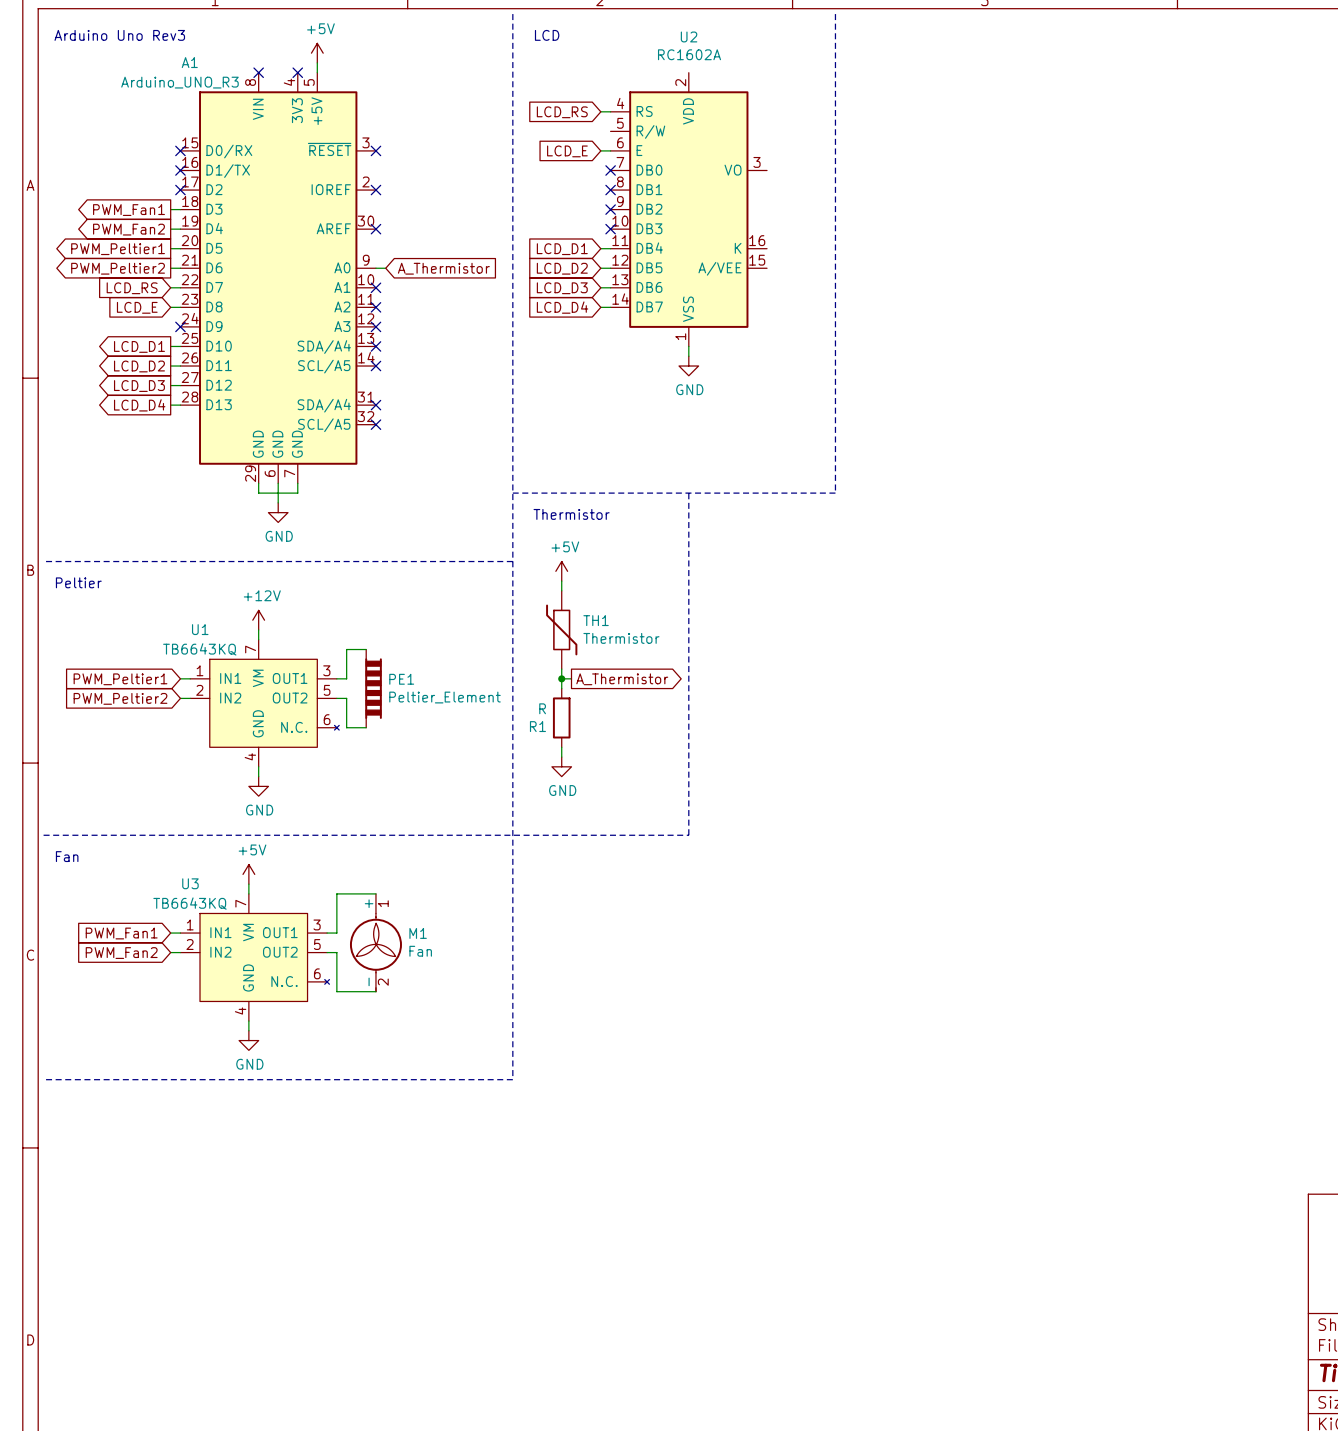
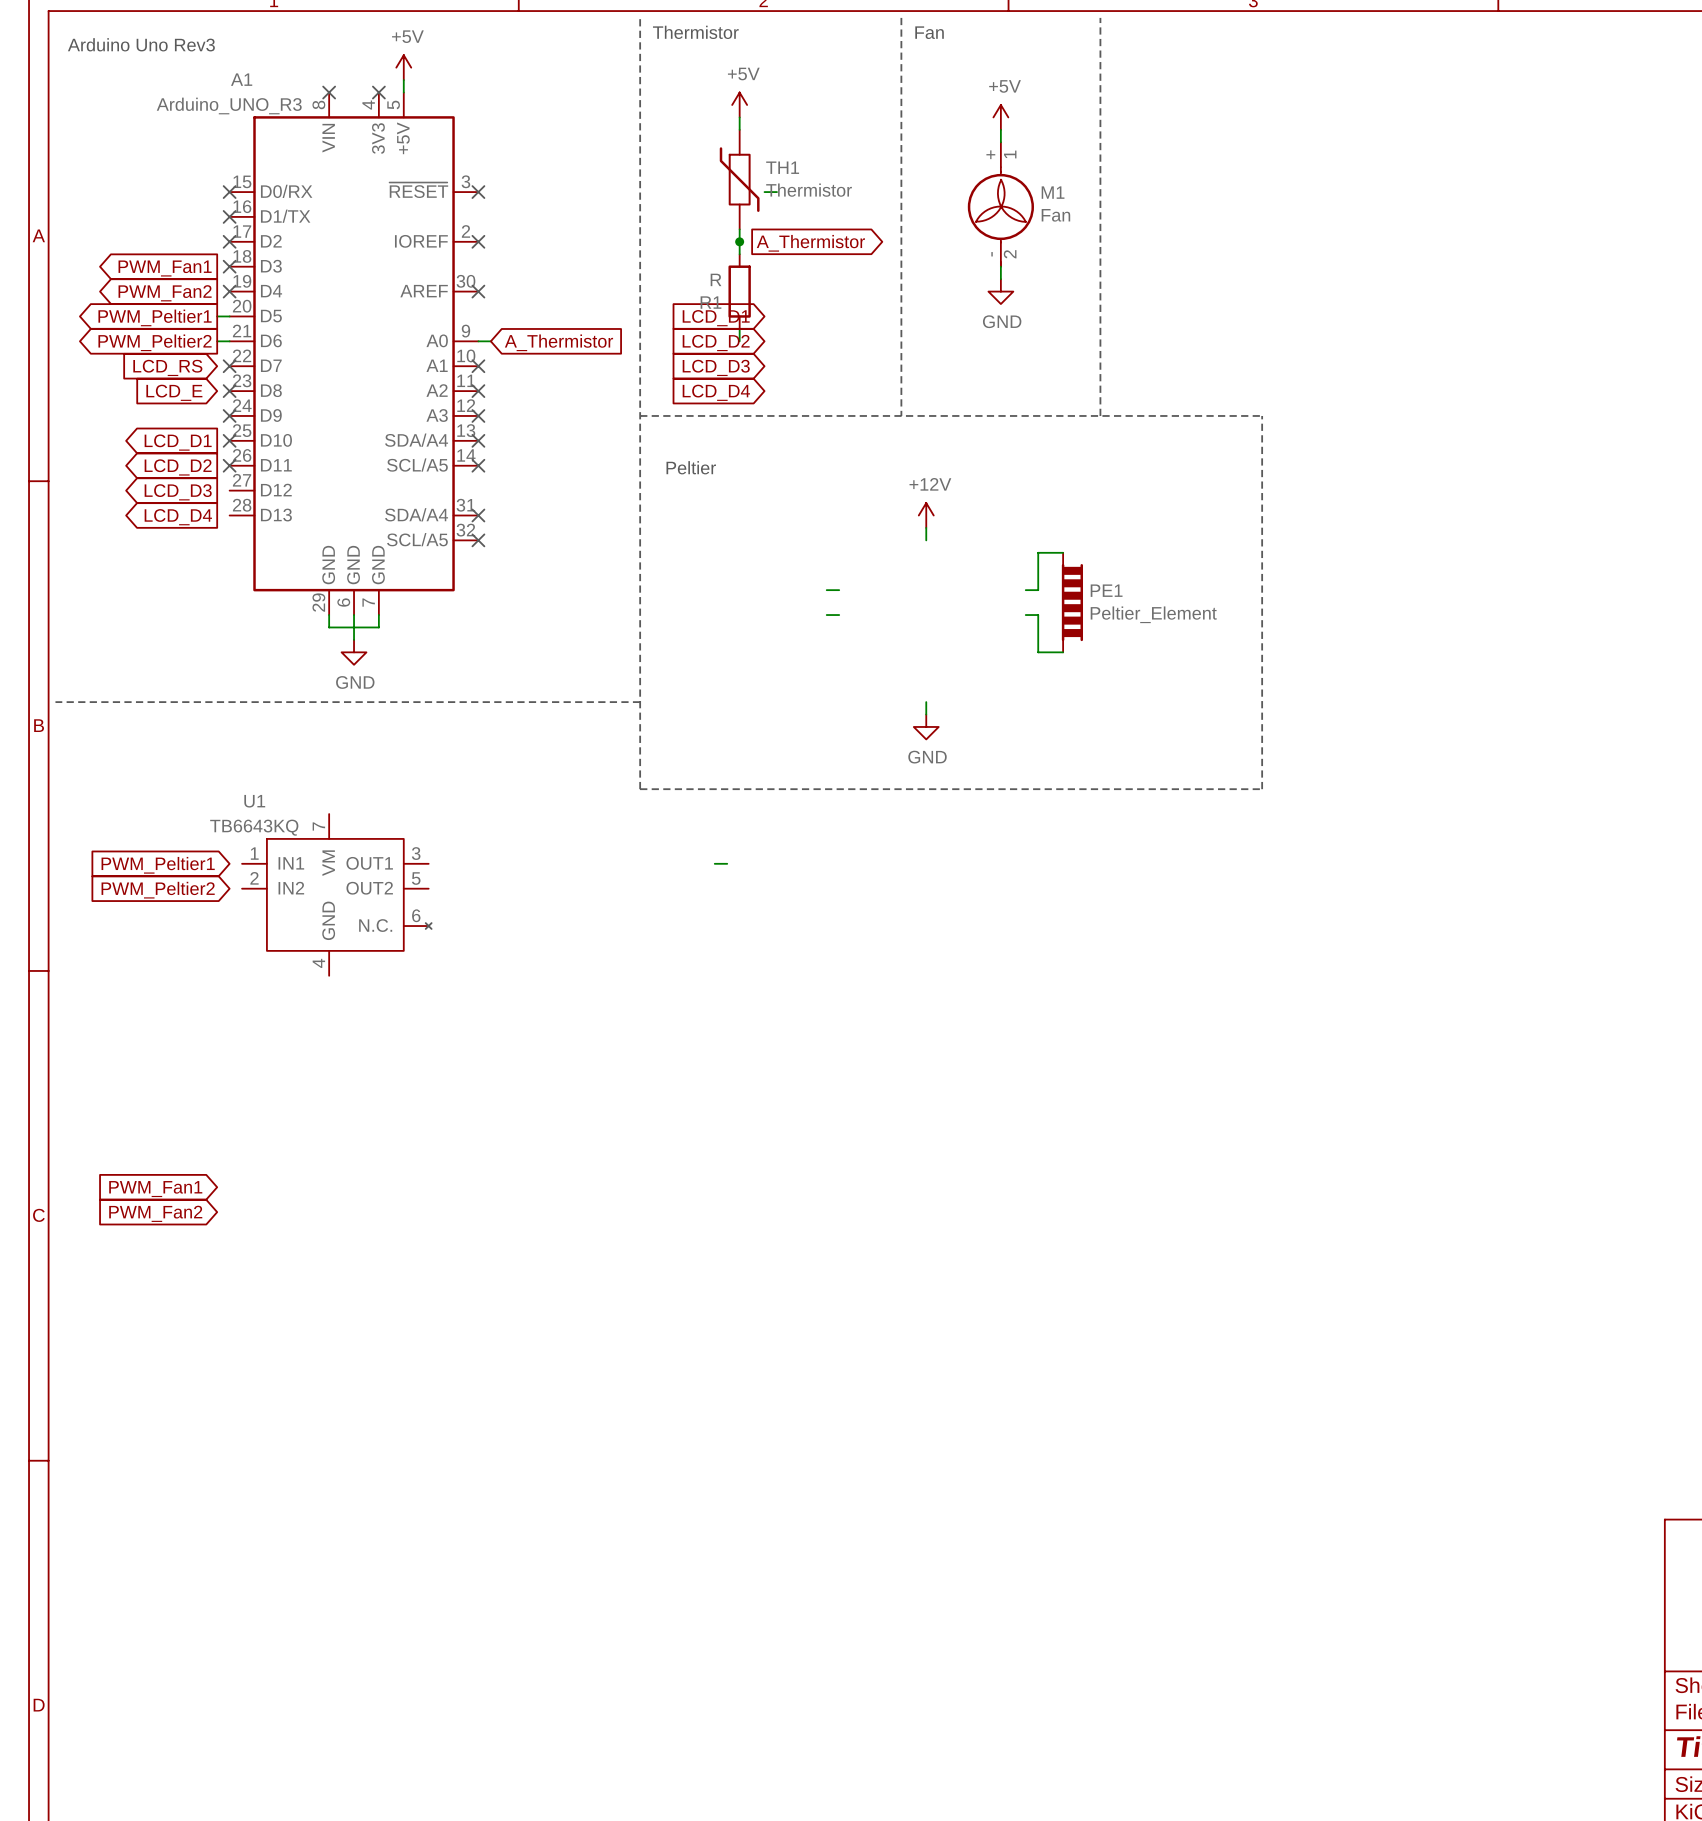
line: none -> (640, 17) (640, 789) (1262, 789) (1262, 415) (640, 415)
line: (512, 14) (512, 1079) (43, 1079) -> none
line: none -> (901, 17) (901, 415)
line: (835, 14) (835, 493) (512, 493) -> none
line: none -> (1100, 17) (1100, 415)
text: none -> Thermistor (695, 32)
text: none -> Fan (929, 32)
text: LCD (547, 35) -> none
power symbol: none -> +5V (739, 104)
wire: none -> (739, 117) (739, 129)
power symbol: none -> +5V (1000, 117)
wire: none -> (1000, 129) (1000, 142)
wire: (600, 111) (610, 111) -> none
global label: LCD_RS (562, 112) -> none
global label: LCD_E (567, 151) -> none
no-connect mark: (610, 170) -> none
wire: none -> (739, 229) (739, 254)
junction: none -> (739, 241)
no-connect mark: (610, 190) -> none
global label: none -> A_Thermistor (810, 243)
wire: (170, 209) (180, 209) -> none
no-connect mark: none -> (229, 266)
no-connect mark: (610, 209) -> none
U2: RC1602A (688, 209) -> none
wire: none -> (1000, 266) (1000, 279)
wire: (170, 229) (180, 229) -> none
no-connect mark: none -> (229, 291)
no-connect mark: (610, 229) -> none
power symbol: none -> GND (1000, 291)
wire: (600, 248) (610, 248) -> none
wire: none -> (739, 328) (739, 341)
wire: (600, 268) (610, 268) -> none
wire: (170, 287) (180, 287) -> none
no-connect mark: none -> (229, 366)
wire: (600, 287) (610, 287) -> (826, 590) (839, 590)
wire: (170, 307) (180, 307) -> none
no-connect mark: none -> (229, 391)
wire: (600, 307) (610, 307) -> (826, 615) (839, 615)
wire: (170, 346) (180, 346) -> none
no-connect mark: none -> (229, 440)
wire: (688, 346) (688, 356) -> (926, 527) (926, 540)
wire: (170, 366) (180, 366) -> none
no-connect mark: none -> (229, 465)
power symbol: GND (688, 366) -> none
text: none -> Peltier (691, 467)
wire: (170, 385) (180, 385) -> none
wire: (170, 405) (180, 405) -> none
power symbol: none -> +12V (926, 515)
wire: none -> (1063, 552) (1038, 552) (1038, 590) (1025, 590)
wire: none -> (1025, 615) (1038, 615) (1038, 652) (1063, 652)
line: (688, 493) (688, 835) (43, 835) -> none
text: Thermistor (571, 514) -> none
line: none -> (55, 702) (640, 702)
line: (43, 561) (512, 561) -> none
power symbol: +5V (561, 571) -> none
power symbol: none -> GND (926, 726)
wire: (561, 581) (561, 590) -> (926, 702) (926, 714)
text: Peltier (78, 582) -> none
power symbol: +12V (258, 620) -> none
wire: (258, 629) (258, 639) -> none
TH1 position: (561, 629) -> (739, 179)
wire: (366, 649) (346, 649) (346, 678) (336, 678) -> none
wire: (561, 669) (561, 688) -> none
wire: (180, 678) (190, 678) -> none
junction: (561, 678) -> none
global label: A_Thermistor (622, 679) -> none
PE1 position: (373, 688) -> (1072, 602)
wire: (180, 698) (190, 698) -> none
wire: (336, 698) (346, 698) (346, 727) (366, 727) -> none
R1 position: (561, 717) -> (739, 291)
wire: (561, 747) (561, 757) -> none
wire: (258, 766) (258, 776) -> none
power symbol: GND (561, 766) -> none
power symbol: GND (258, 786) -> none
text: Fan (67, 856) -> none
power symbol: +5V (248, 874) -> none
wire: (248, 884) (248, 893) -> none
wire: (375, 893) (336, 893) (336, 933) (327, 933) -> none
wire: (170, 933) (180, 933) -> none
M1 position: (375, 942) -> (1000, 204)
wire: (170, 952) (180, 952) -> none
wire: (327, 952) (336, 952) (336, 991) (375, 991) -> none
U3: TB6643KQ (254, 957) -> none
wire: (248, 1021) (248, 1030) -> none
power symbol: GND (248, 1040) -> none

